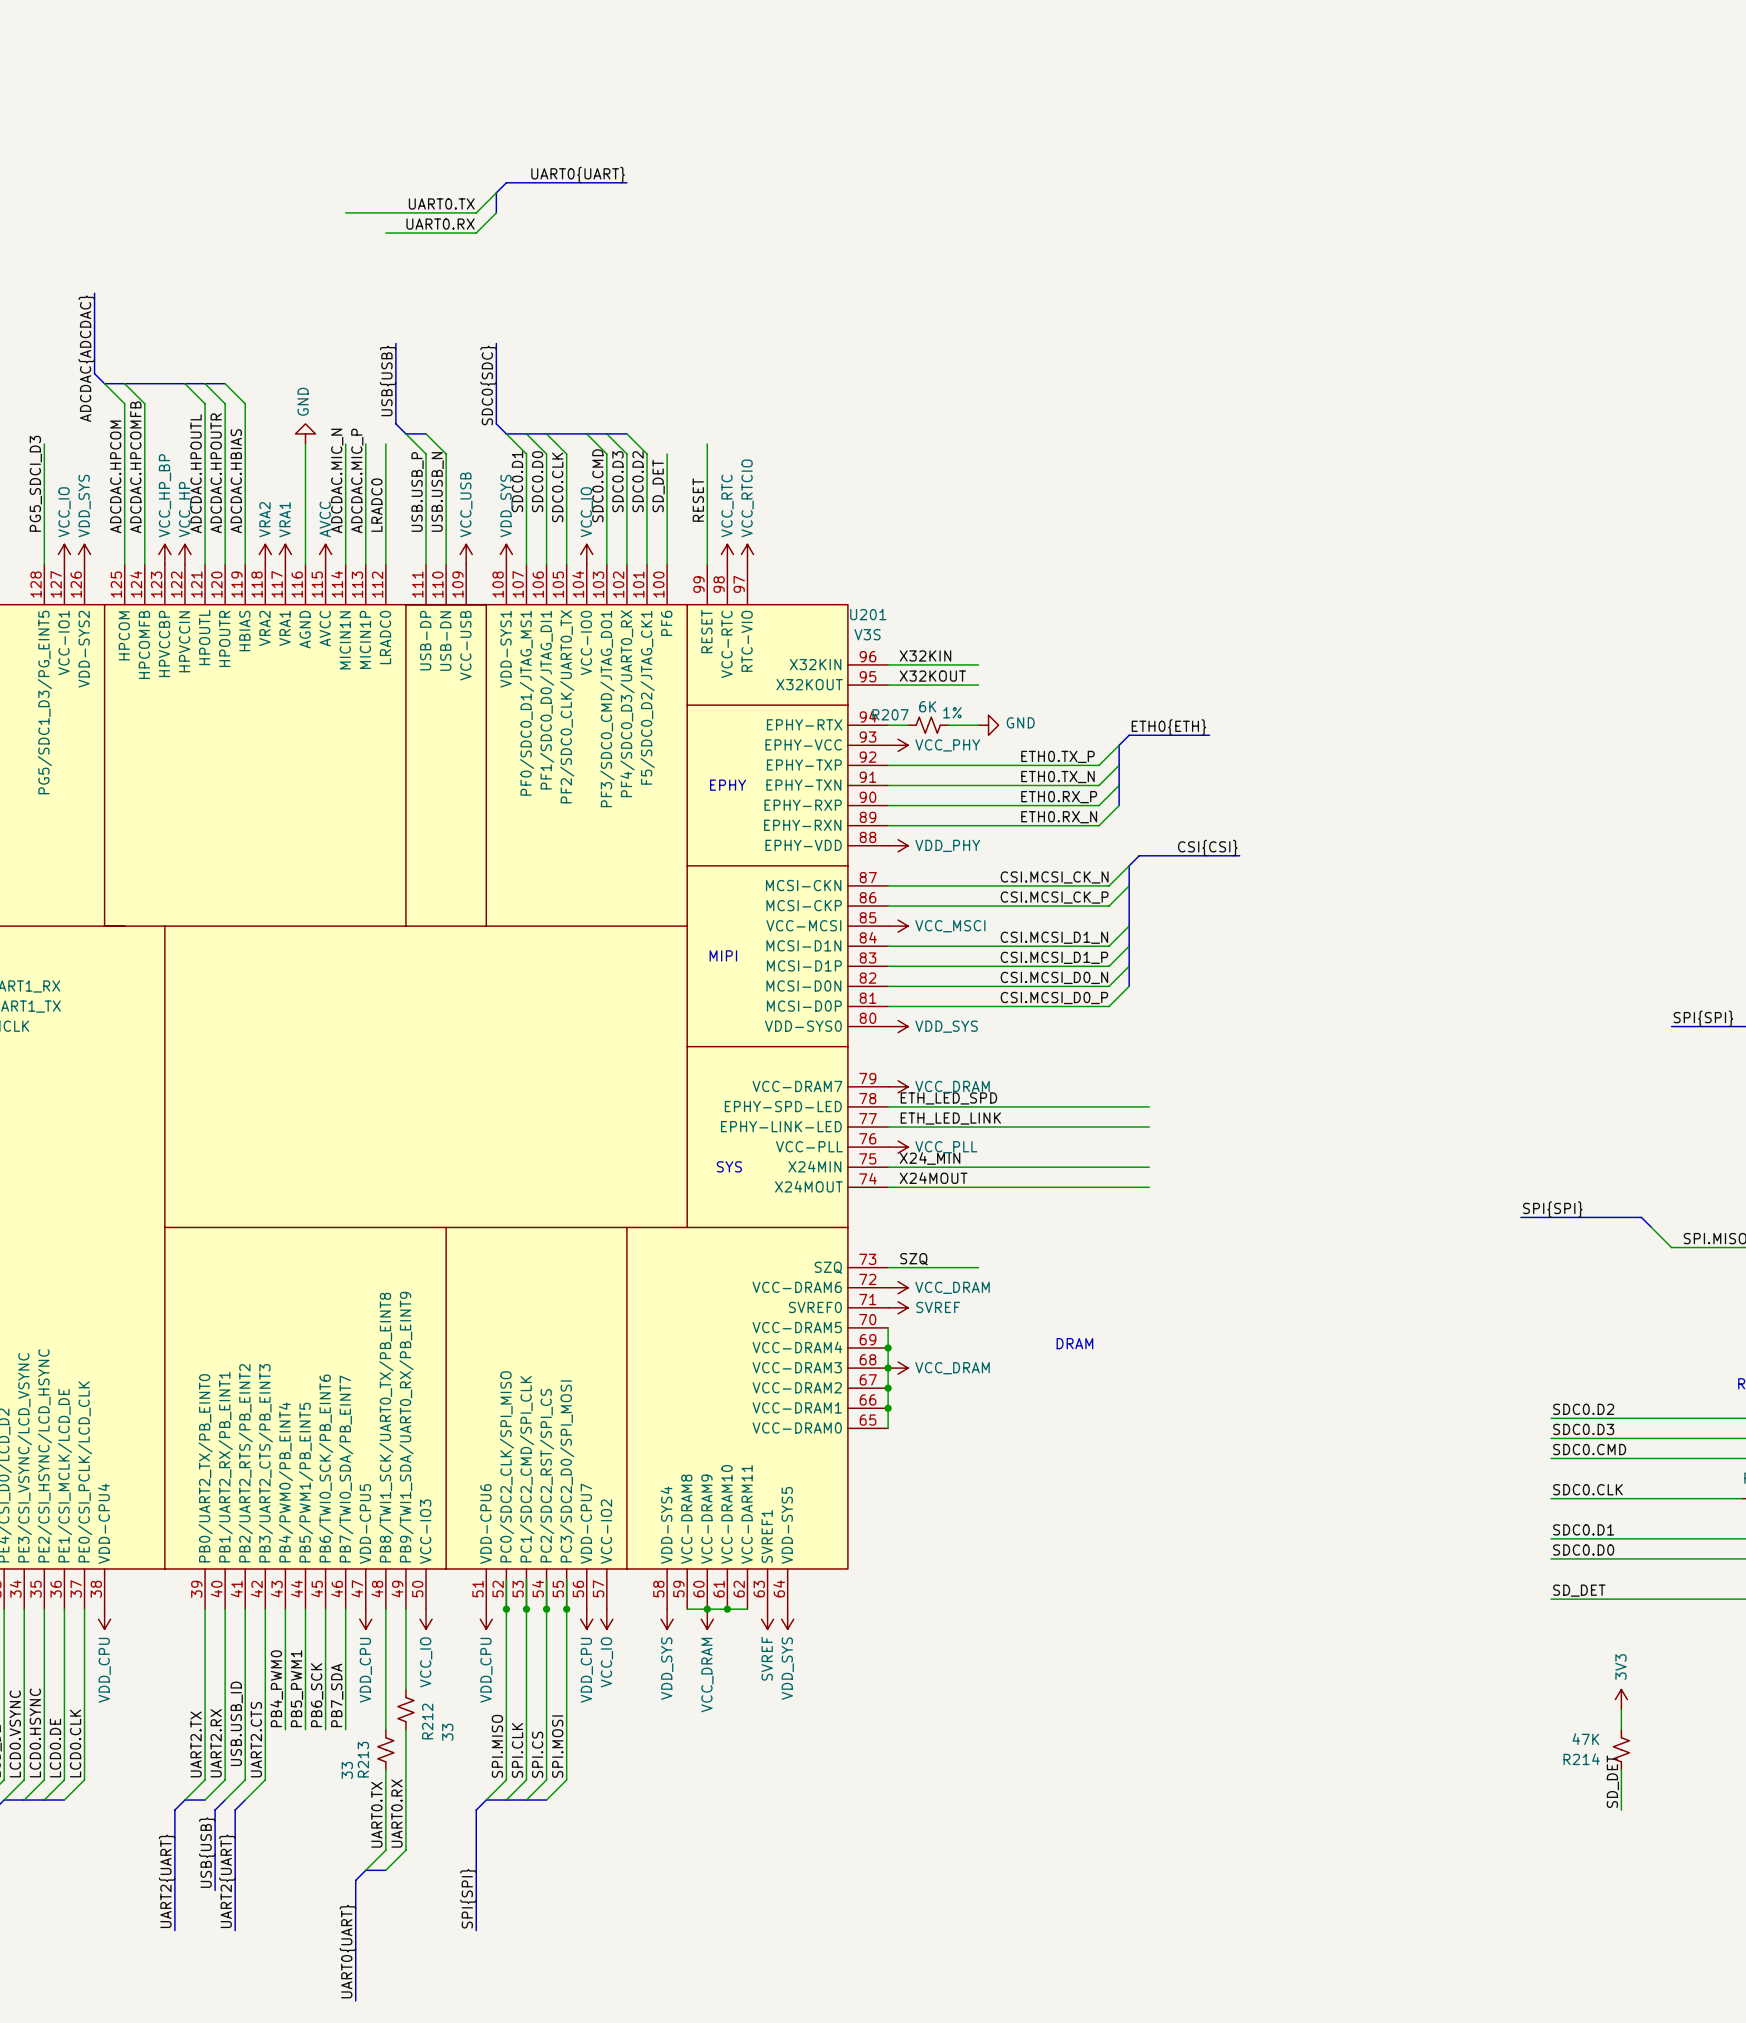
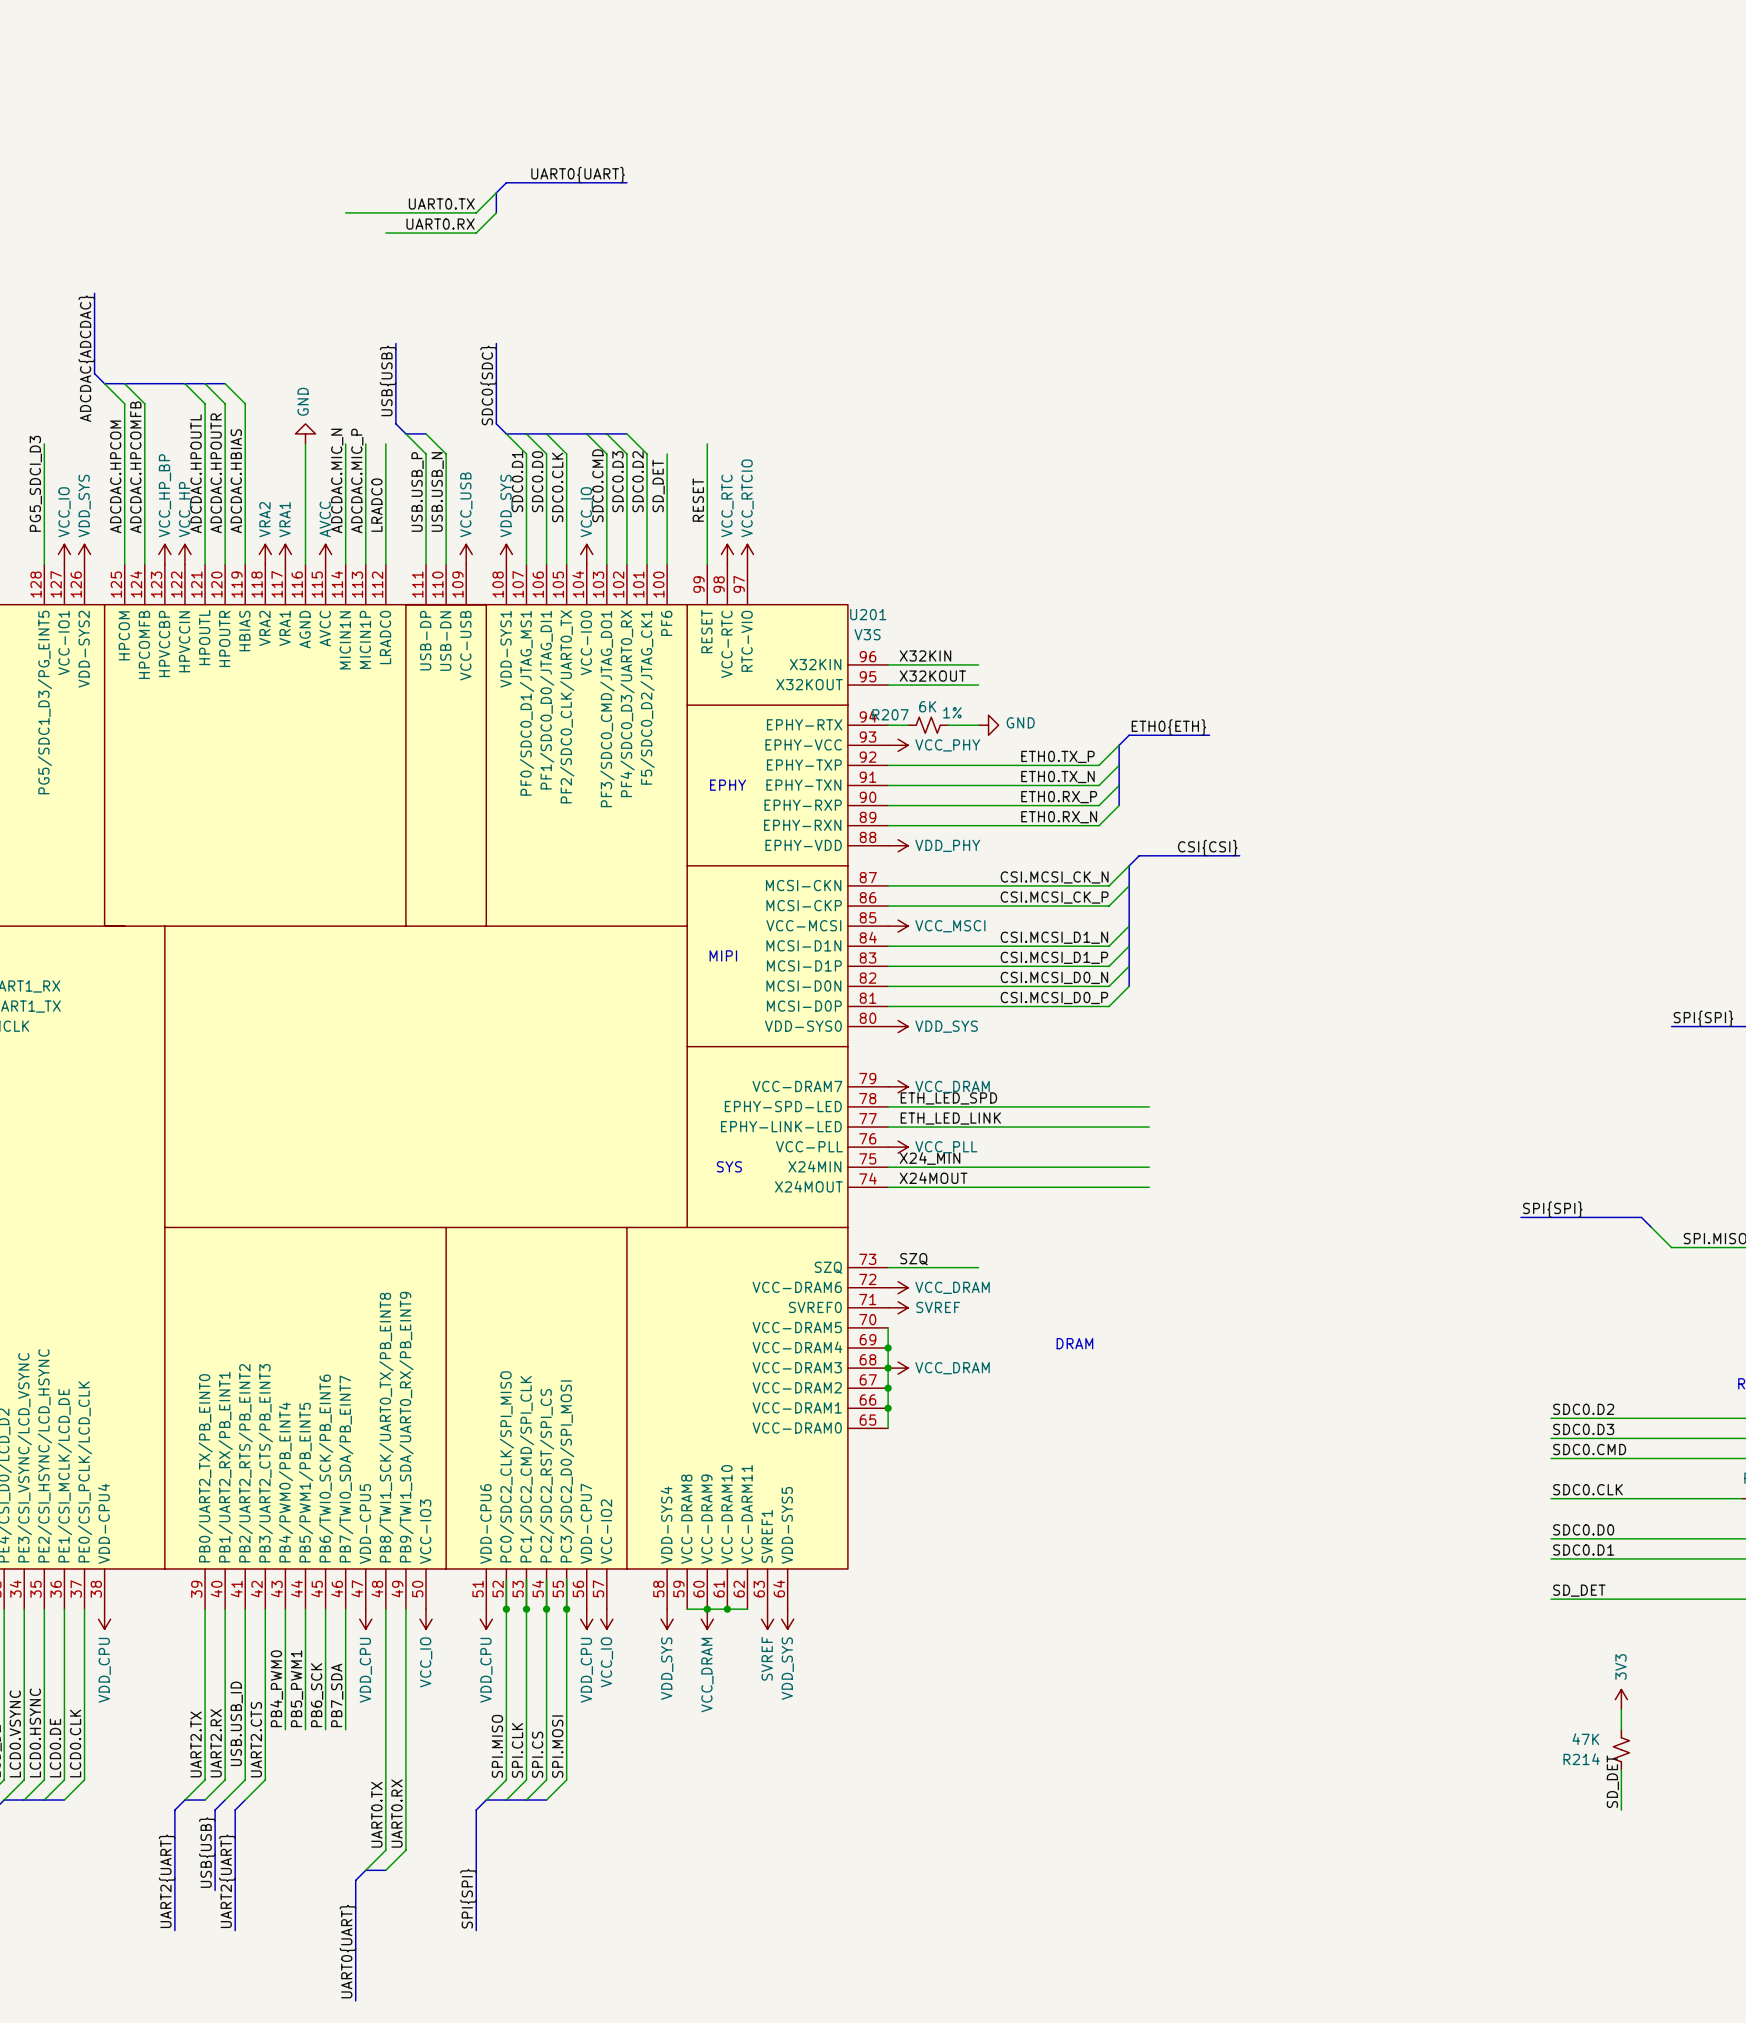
label: SDC0.D1 (1583, 1529) -> SDC0.D0 (1583, 1529)
label: SDC0.D0 (1583, 1549) -> SDC0.D1 (1583, 1549)
R212: 33 (405, 1709) -> none
R213: 33 (385, 1749) -> none

